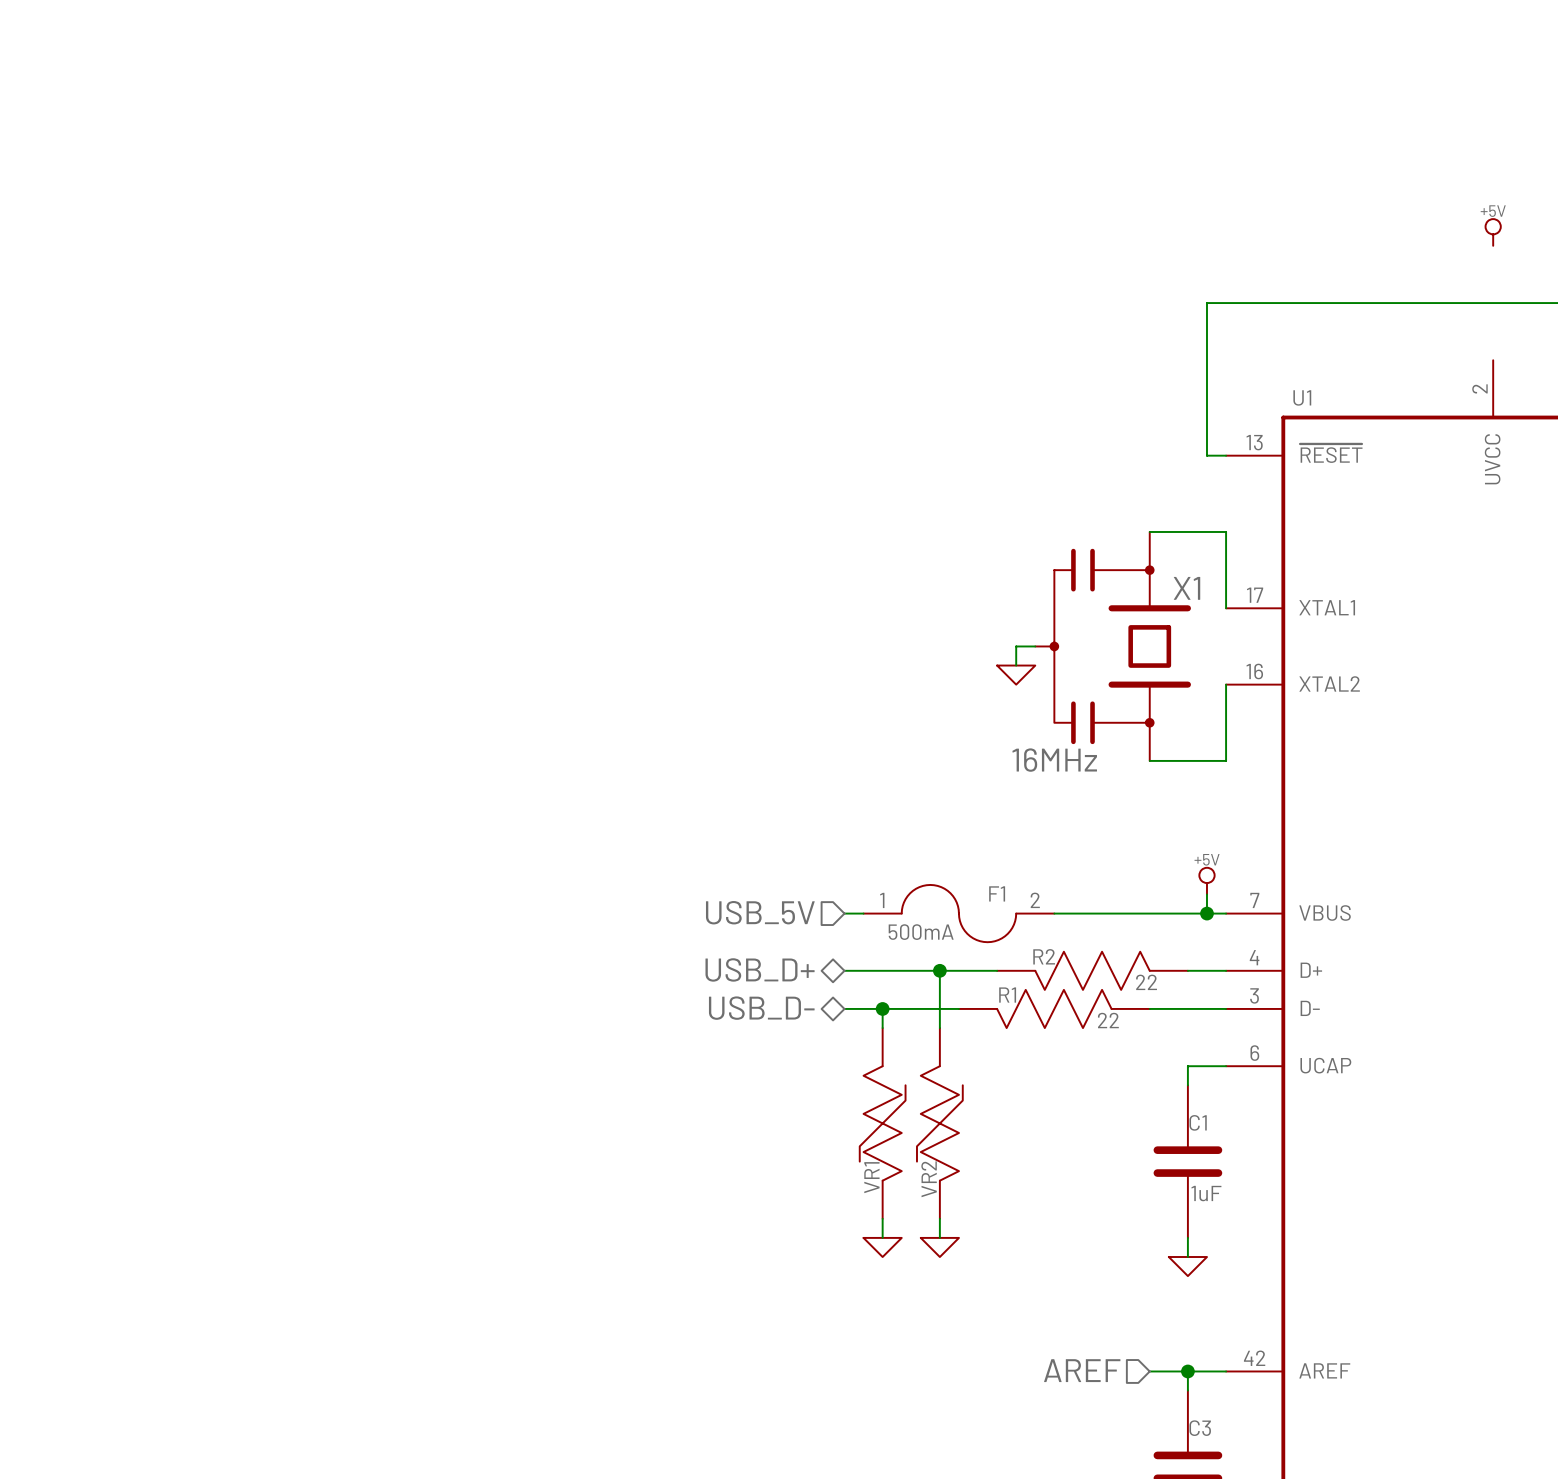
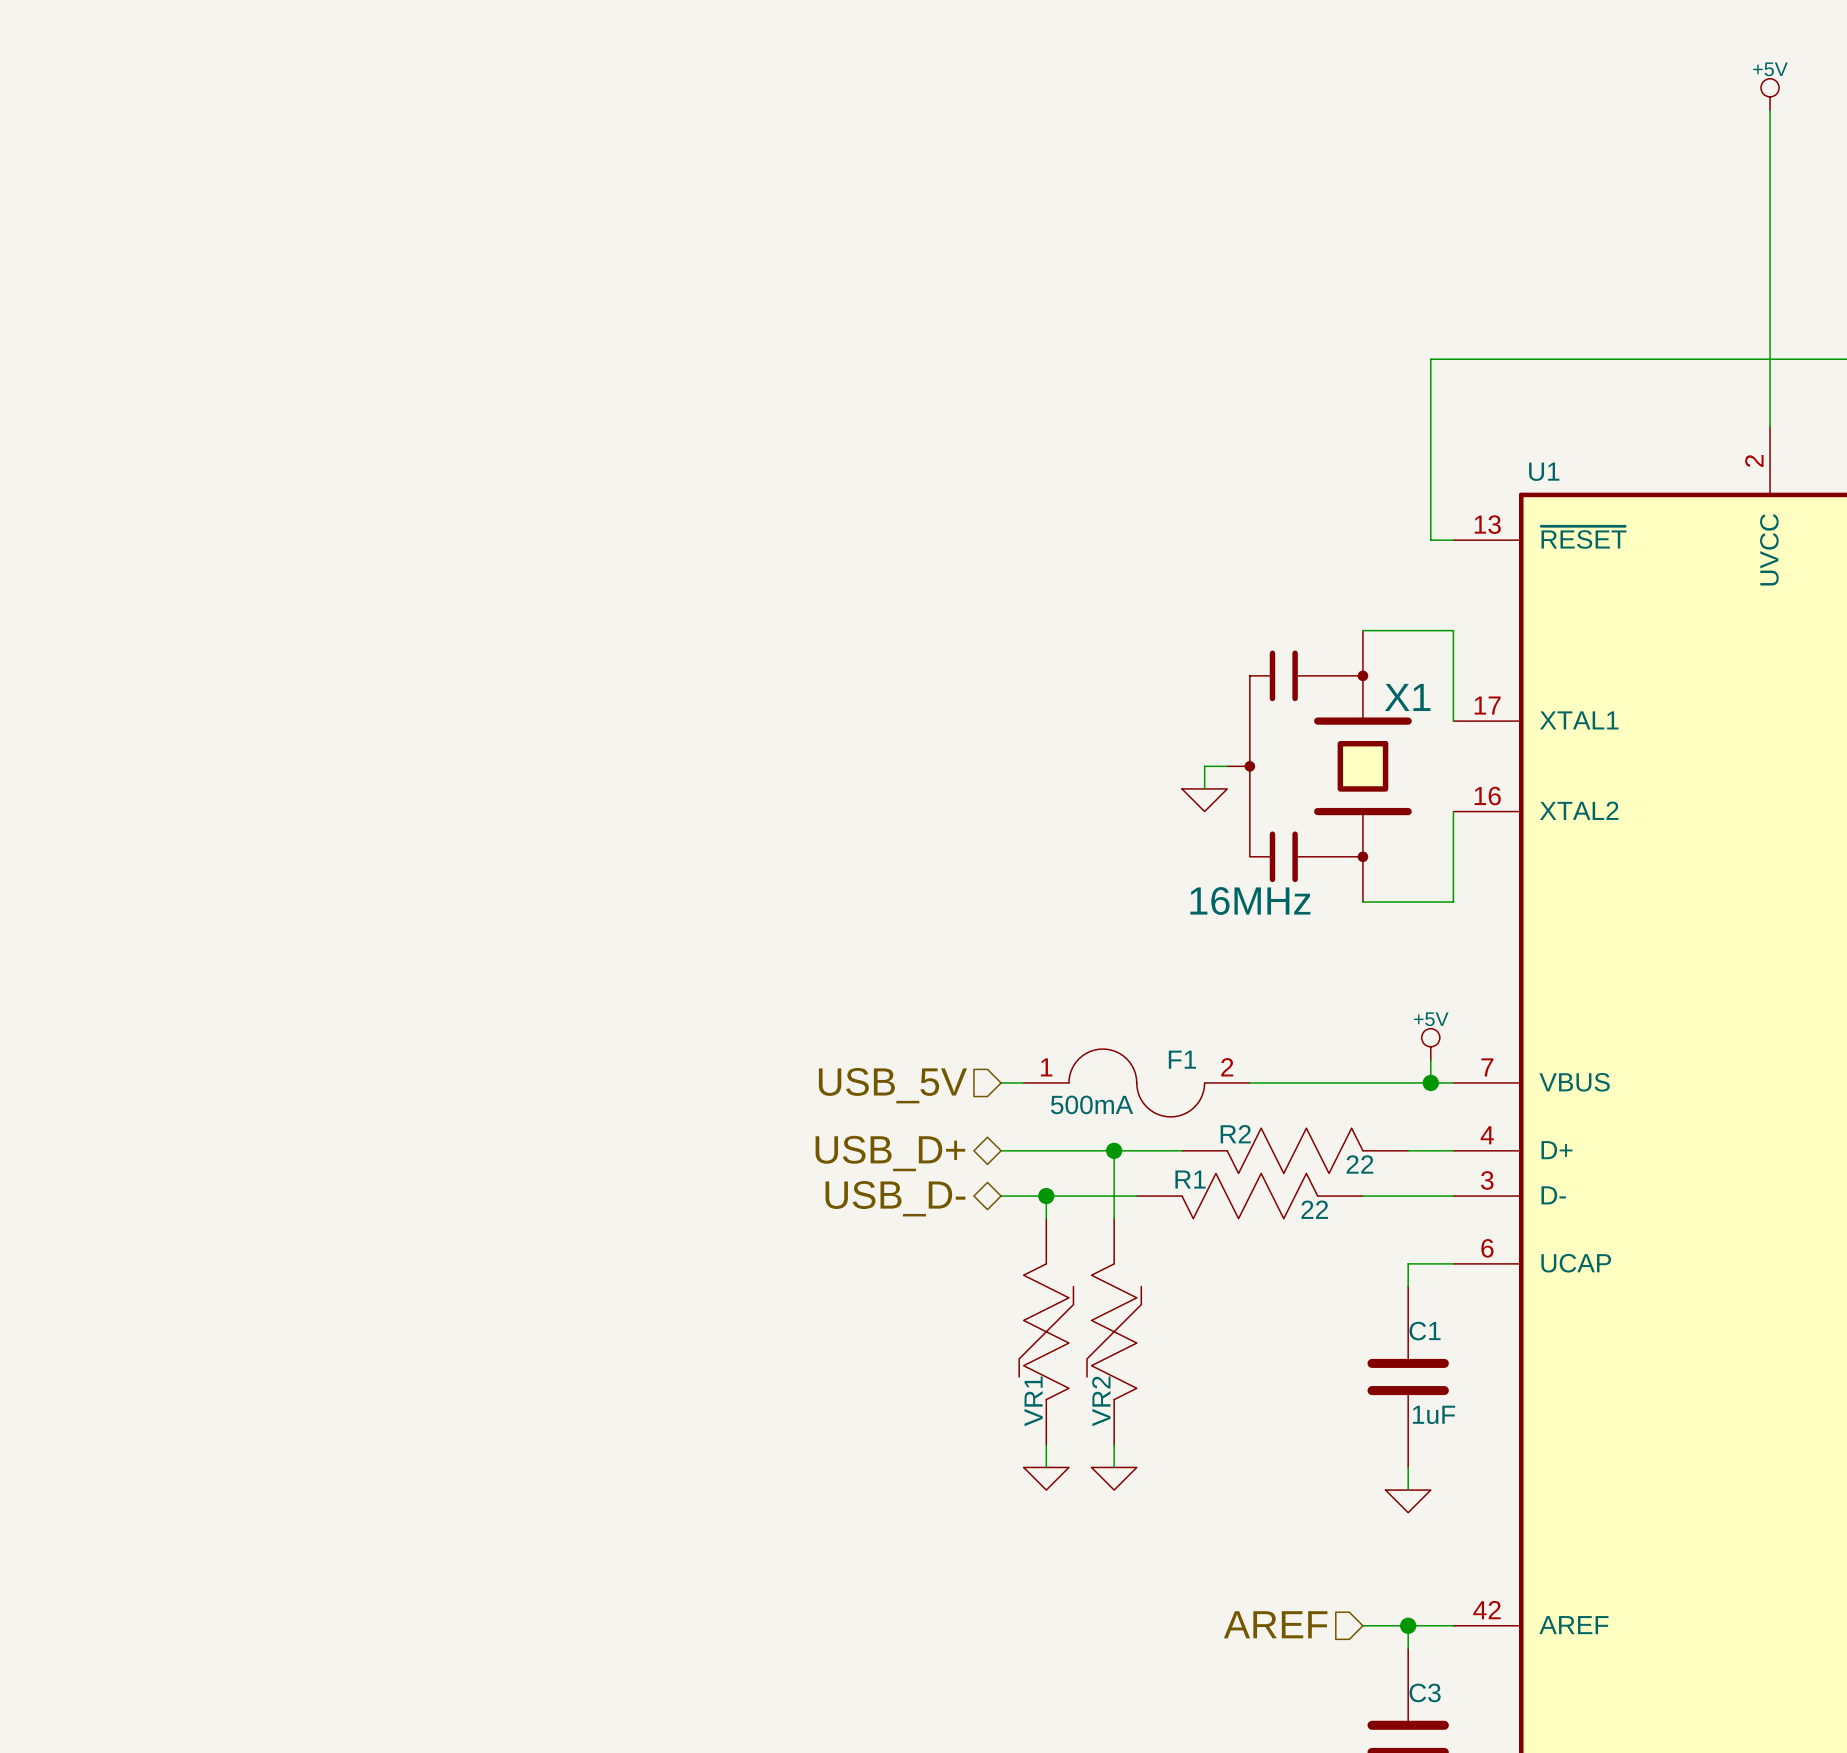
power symbol: none -> +5V (1770, 94)
wire: none -> (1770, 110) (1770, 427)
power symbol: +5V (1493, 232) -> none

